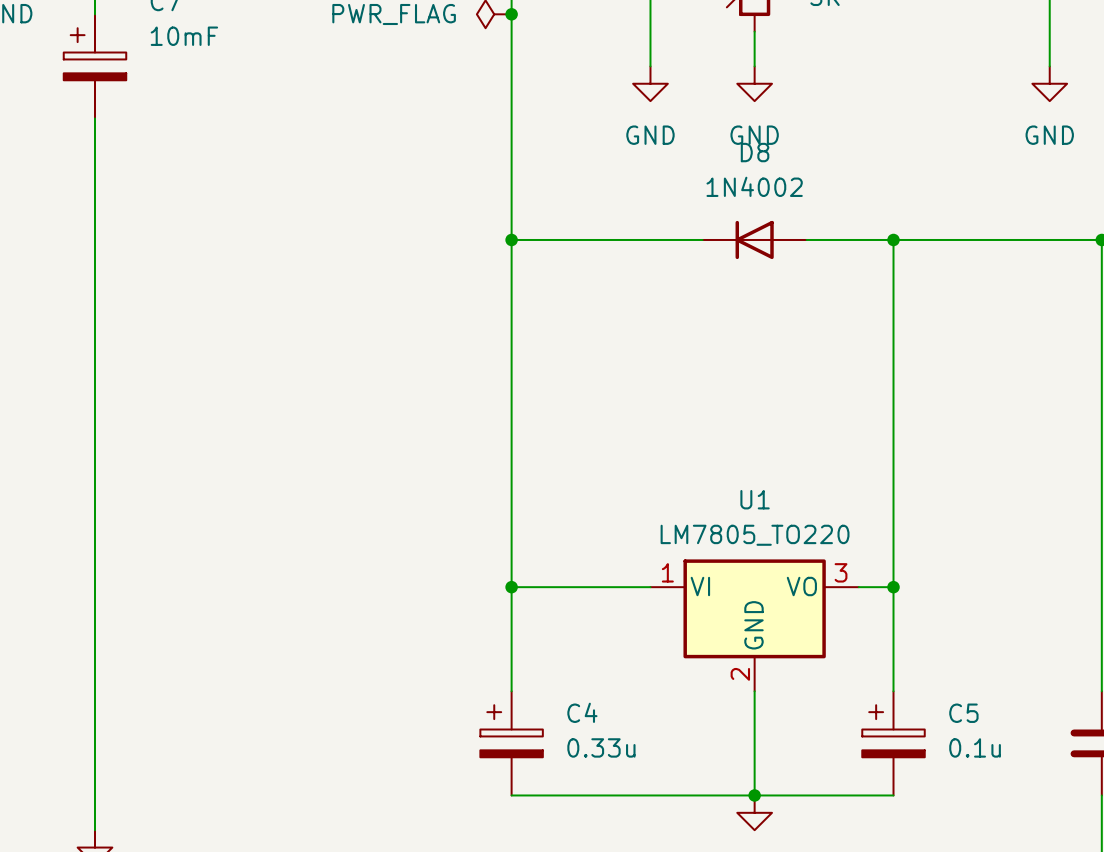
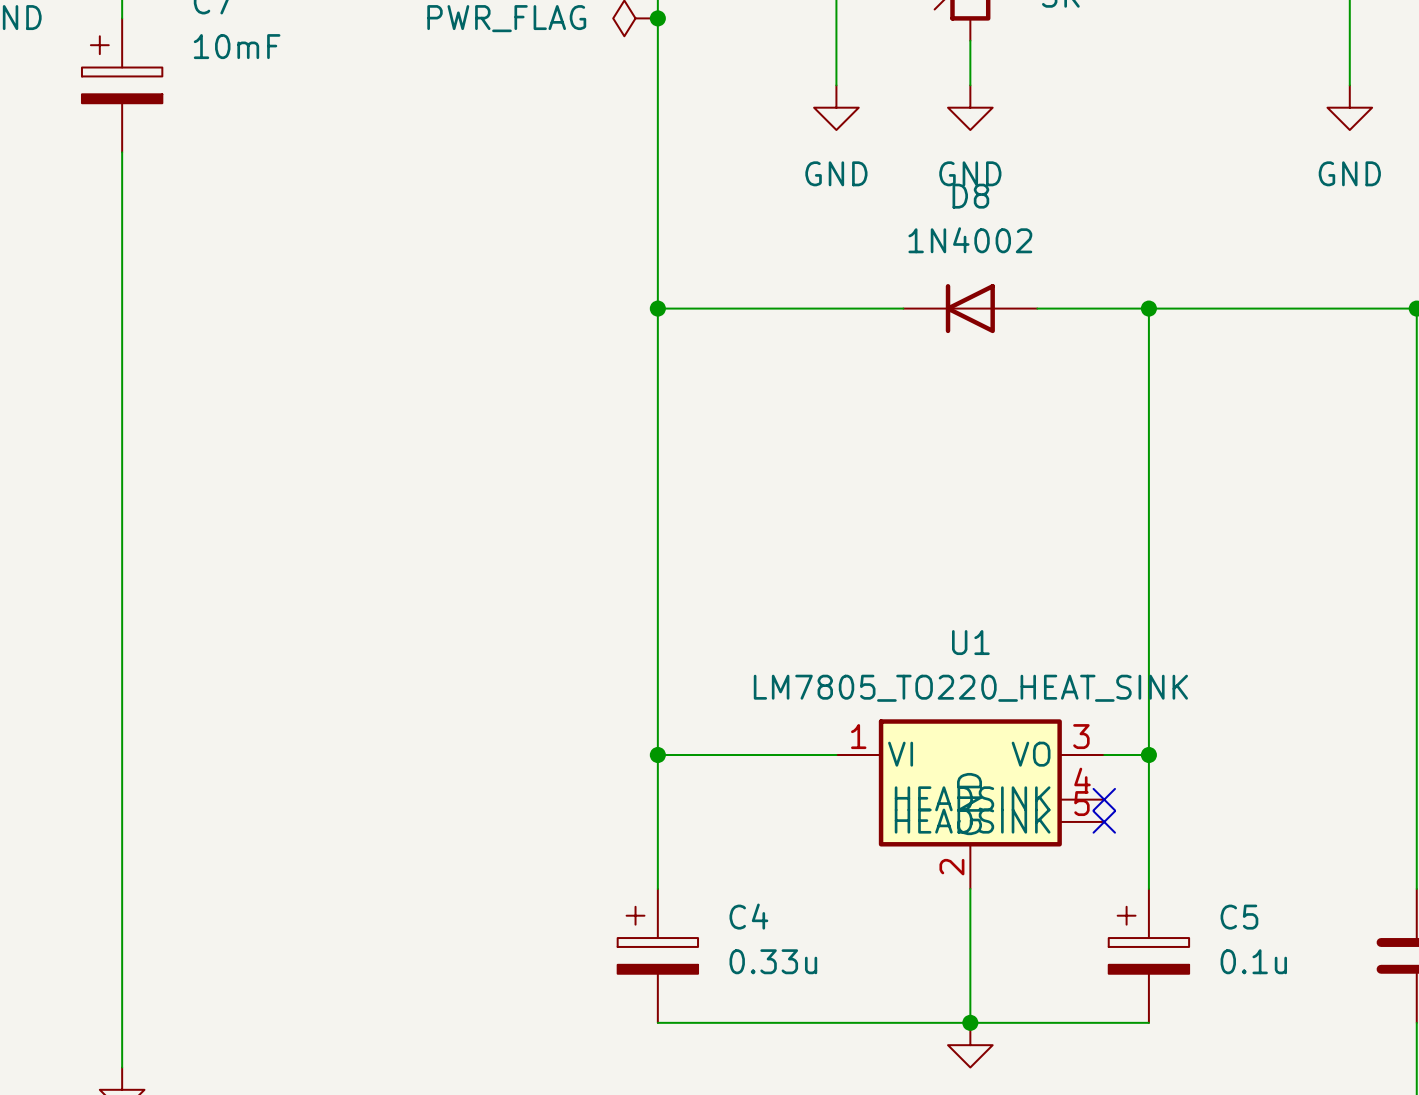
U1 value: LM7805_TO220 (755, 535) -> LM7805_TO220_HEAT_SINK (970, 688)
U1 symbol: [650, 559, 859, 692] -> [836, 719, 1105, 889]
no-connect mark: none -> (1104, 799)
no-connect mark: none -> (1104, 821)

